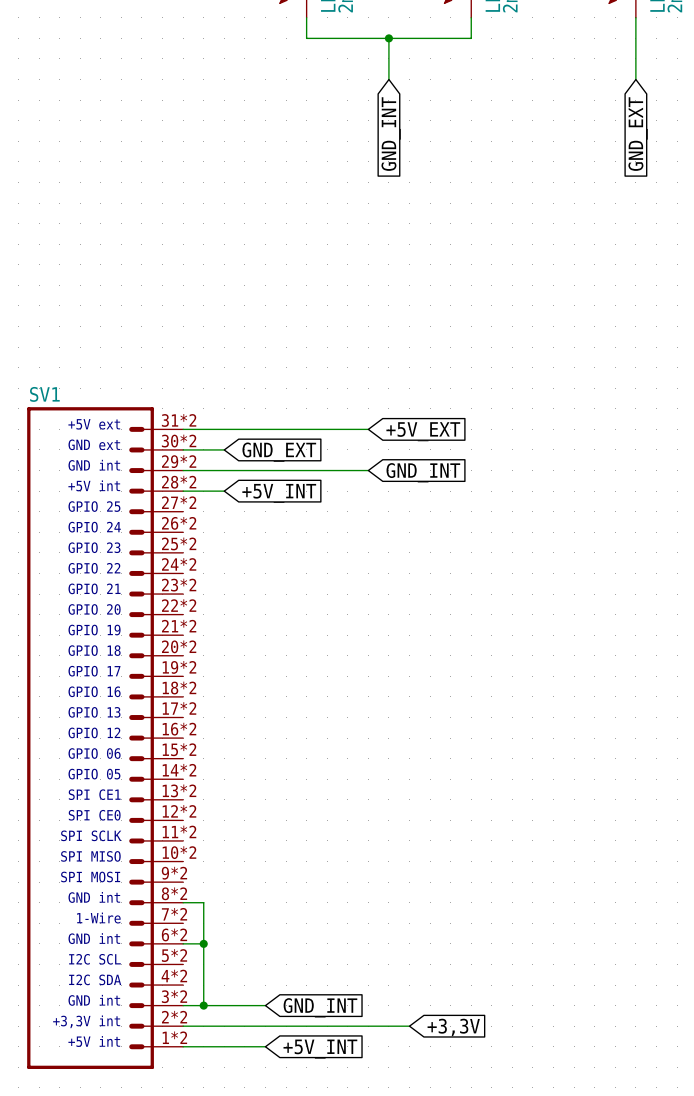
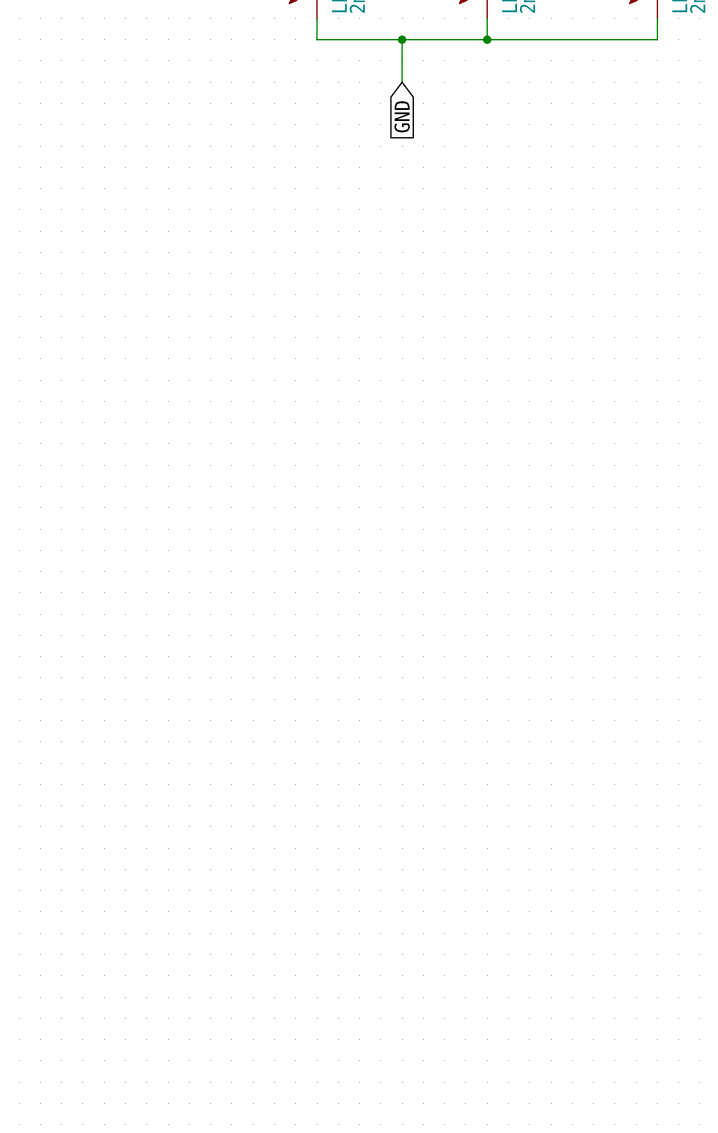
junction: none -> (487, 39)
wire: (635, 38) (635, 79) -> (657, 39) (487, 39)
global label: GND_INT (391, 134) -> GND (402, 116)
global label: GND_EXT (638, 134) -> none
wire: (183, 429) (368, 429) -> none
global label: +5V_EXT (423, 431) -> none
wire: (183, 449) (224, 449) -> none
global label: GND_EXT (279, 452) -> none
wire: (183, 470) (368, 470) -> none
global label: GND_INT (423, 472) -> none
wire: (183, 491) (224, 491) -> none
global label: +5V_INT (279, 493) -> none
SV1: (105, 738) -> none
wire: (183, 902) (203, 902) (203, 1005) -> none
wire: (183, 943) (203, 943) -> none
junction: (203, 943) -> none
wire: (183, 1005) (265, 1005) -> none
junction: (203, 1005) -> none
global label: GND_INT (320, 1007) -> none
wire: (183, 1026) (409, 1026) -> none
global label: +3,3V (453, 1027) -> none
wire: (183, 1046) (265, 1046) -> none
global label: +5V_INT (320, 1049) -> none

